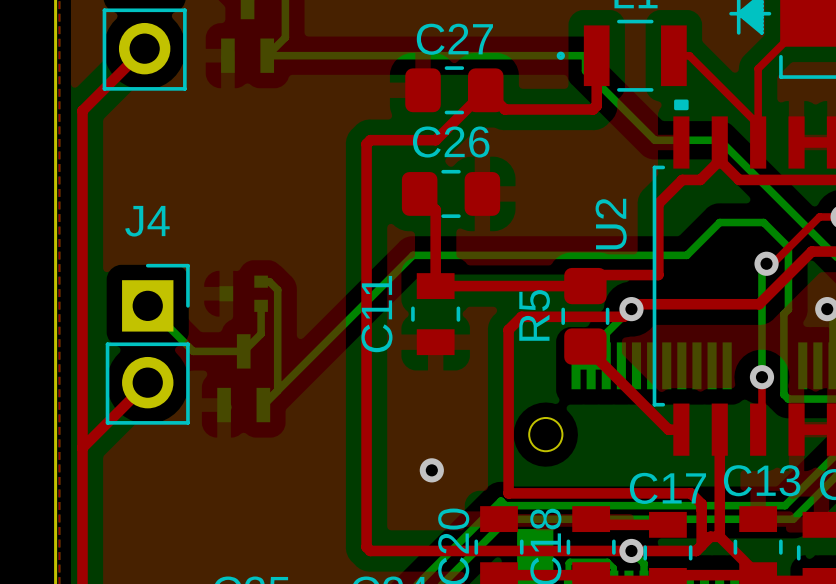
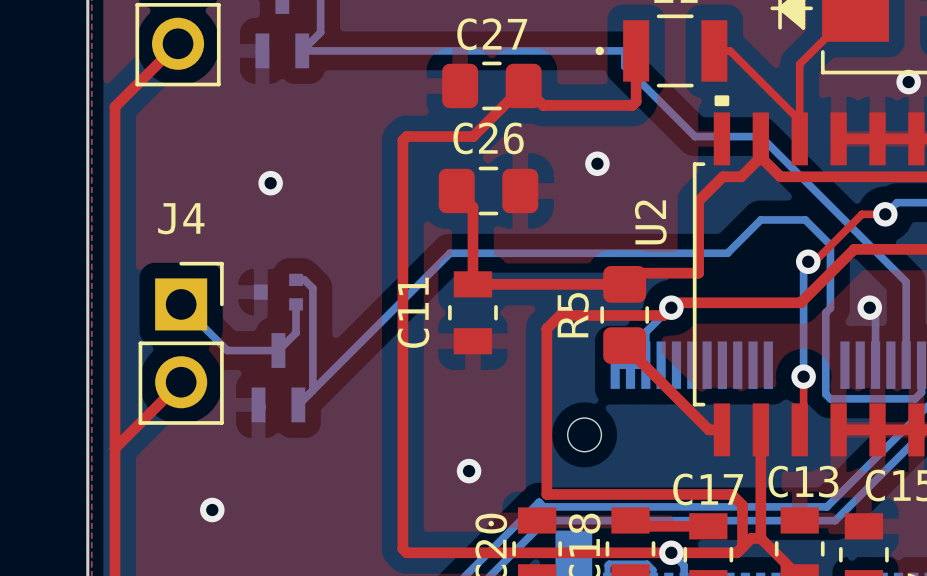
via: none -> (597, 163)
via: none -> (270, 183)
via: none -> (212, 510)

